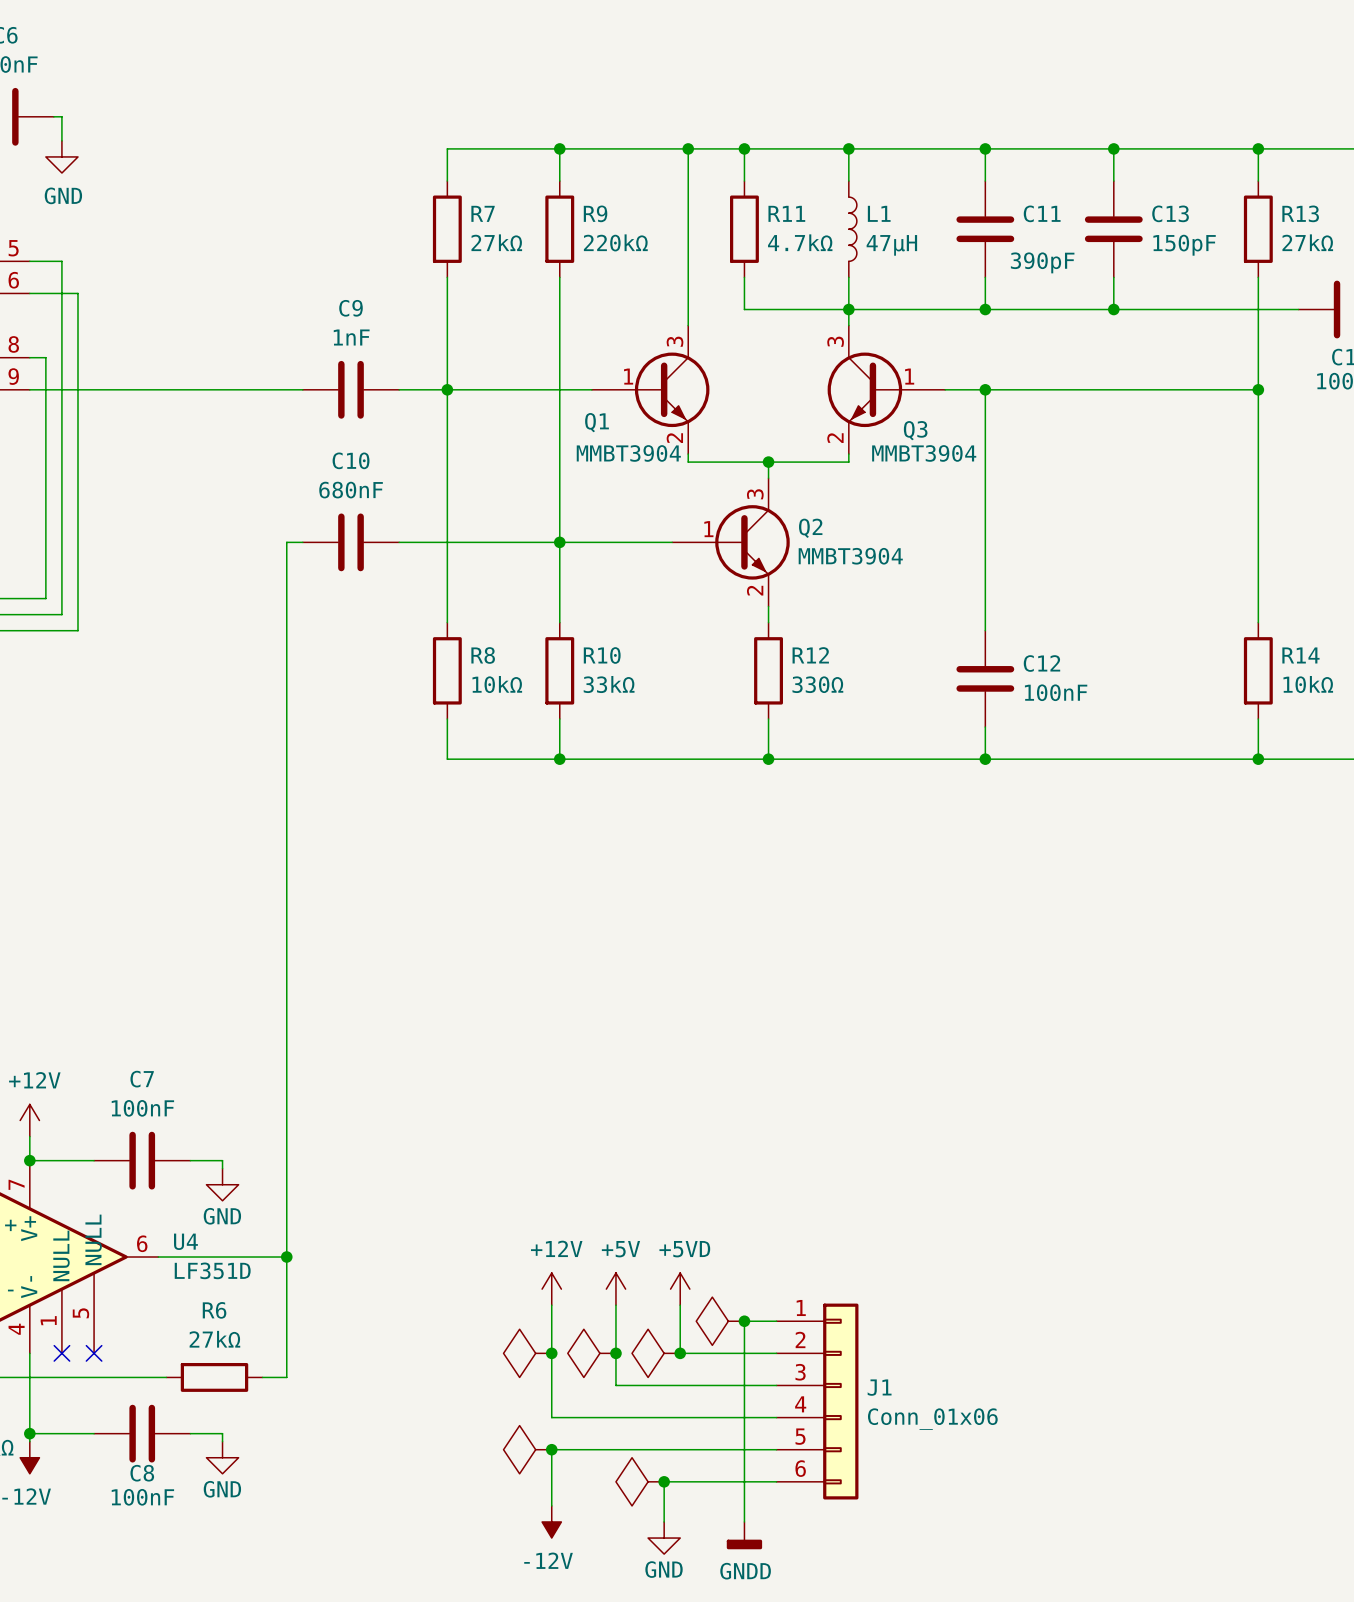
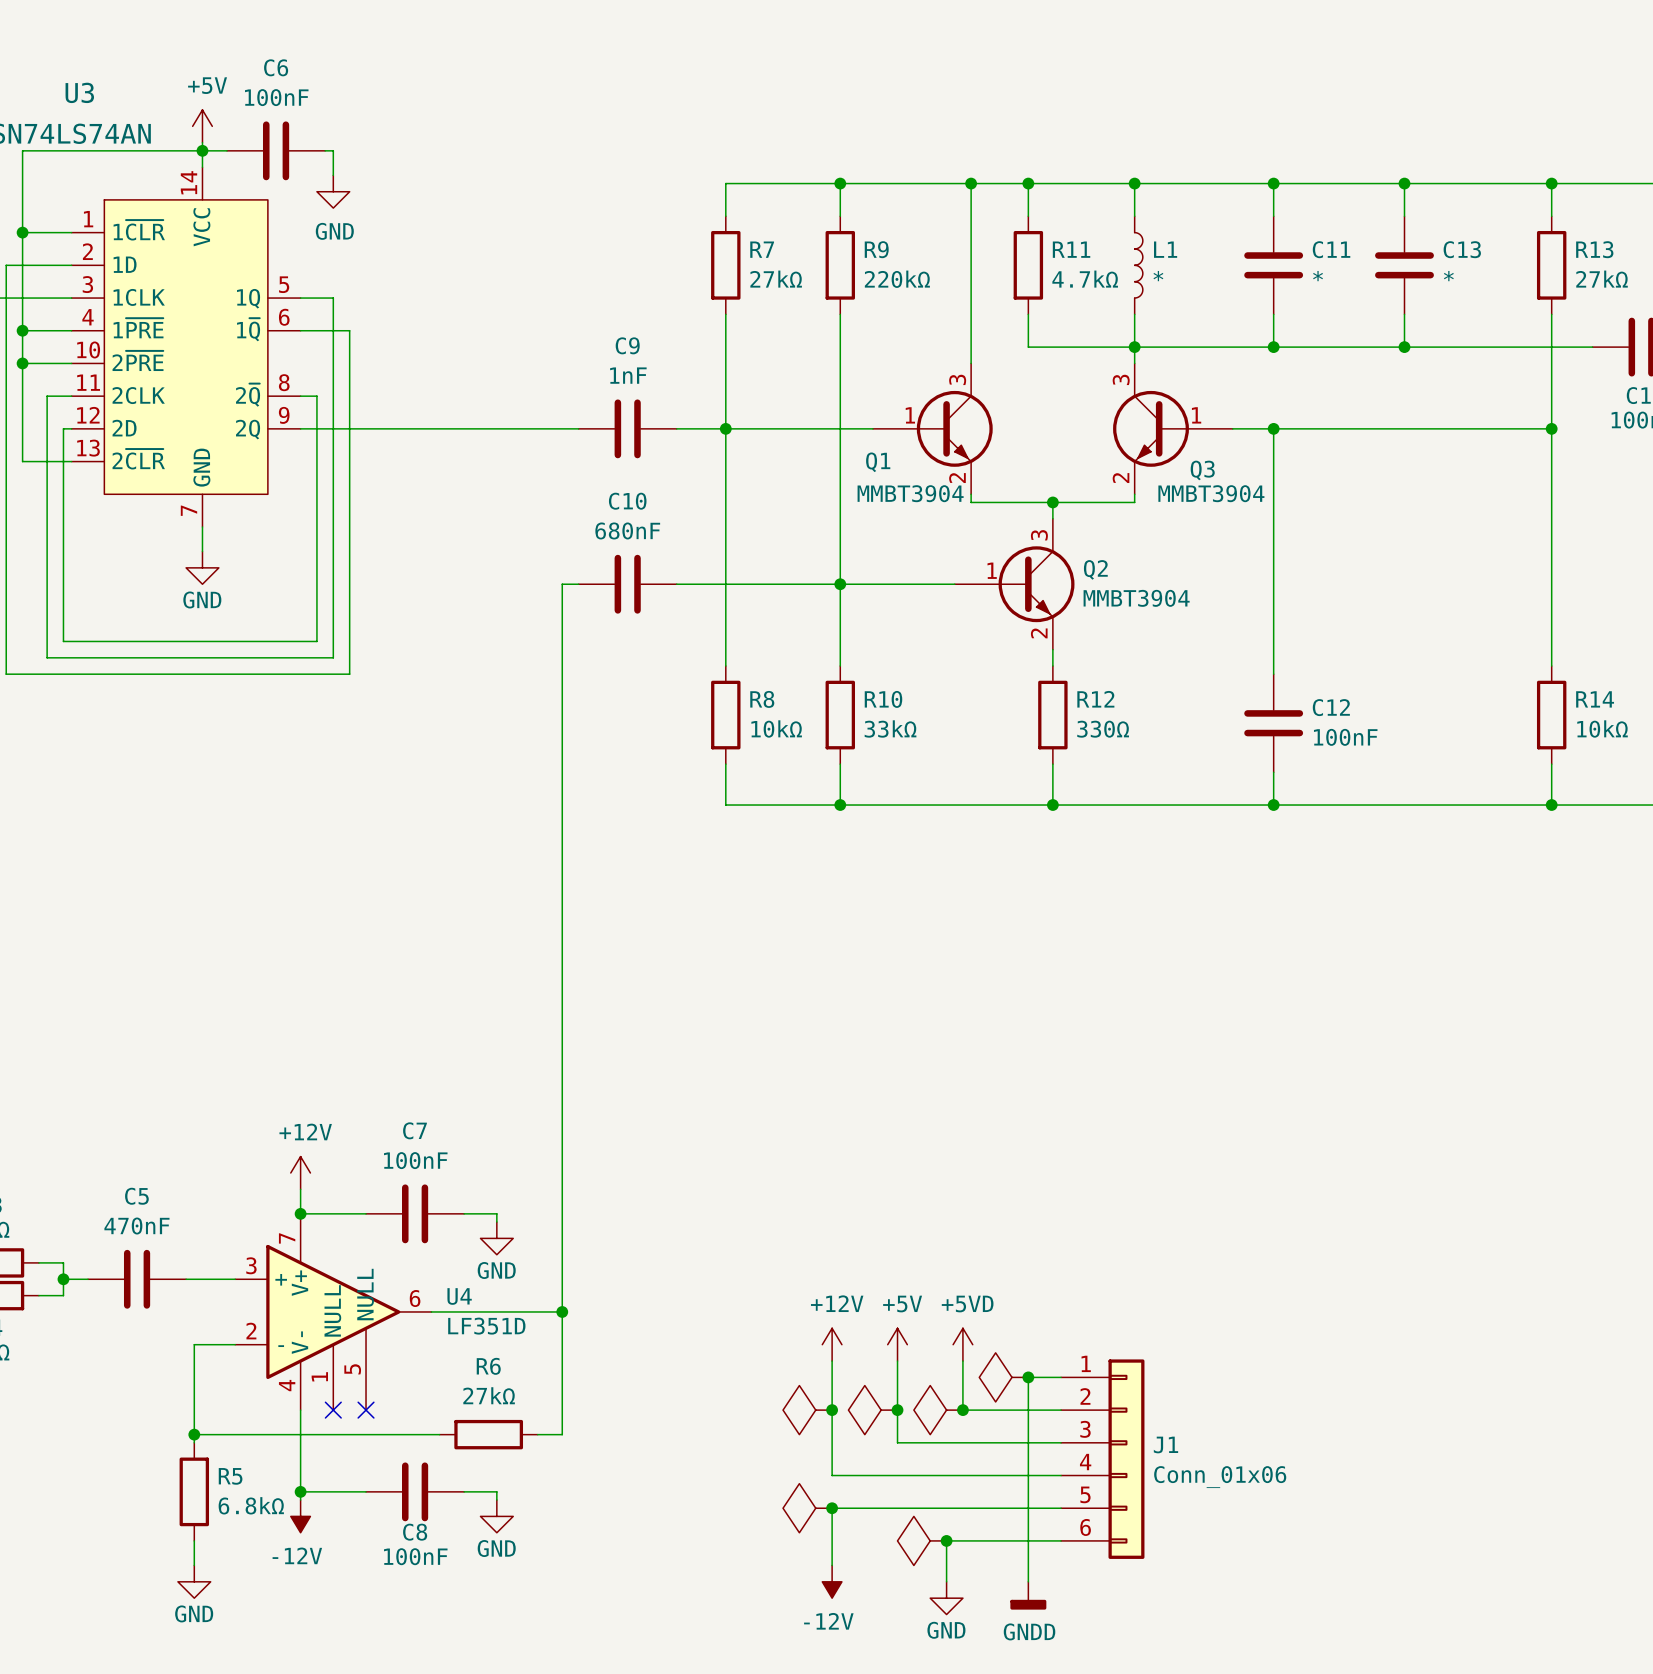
L1 value: 47µH (891, 245) -> * (1158, 276)
C13 value: 150pF (1184, 245) -> * (1448, 276)
C11 value: 390pF (1042, 262) -> * (1318, 276)

